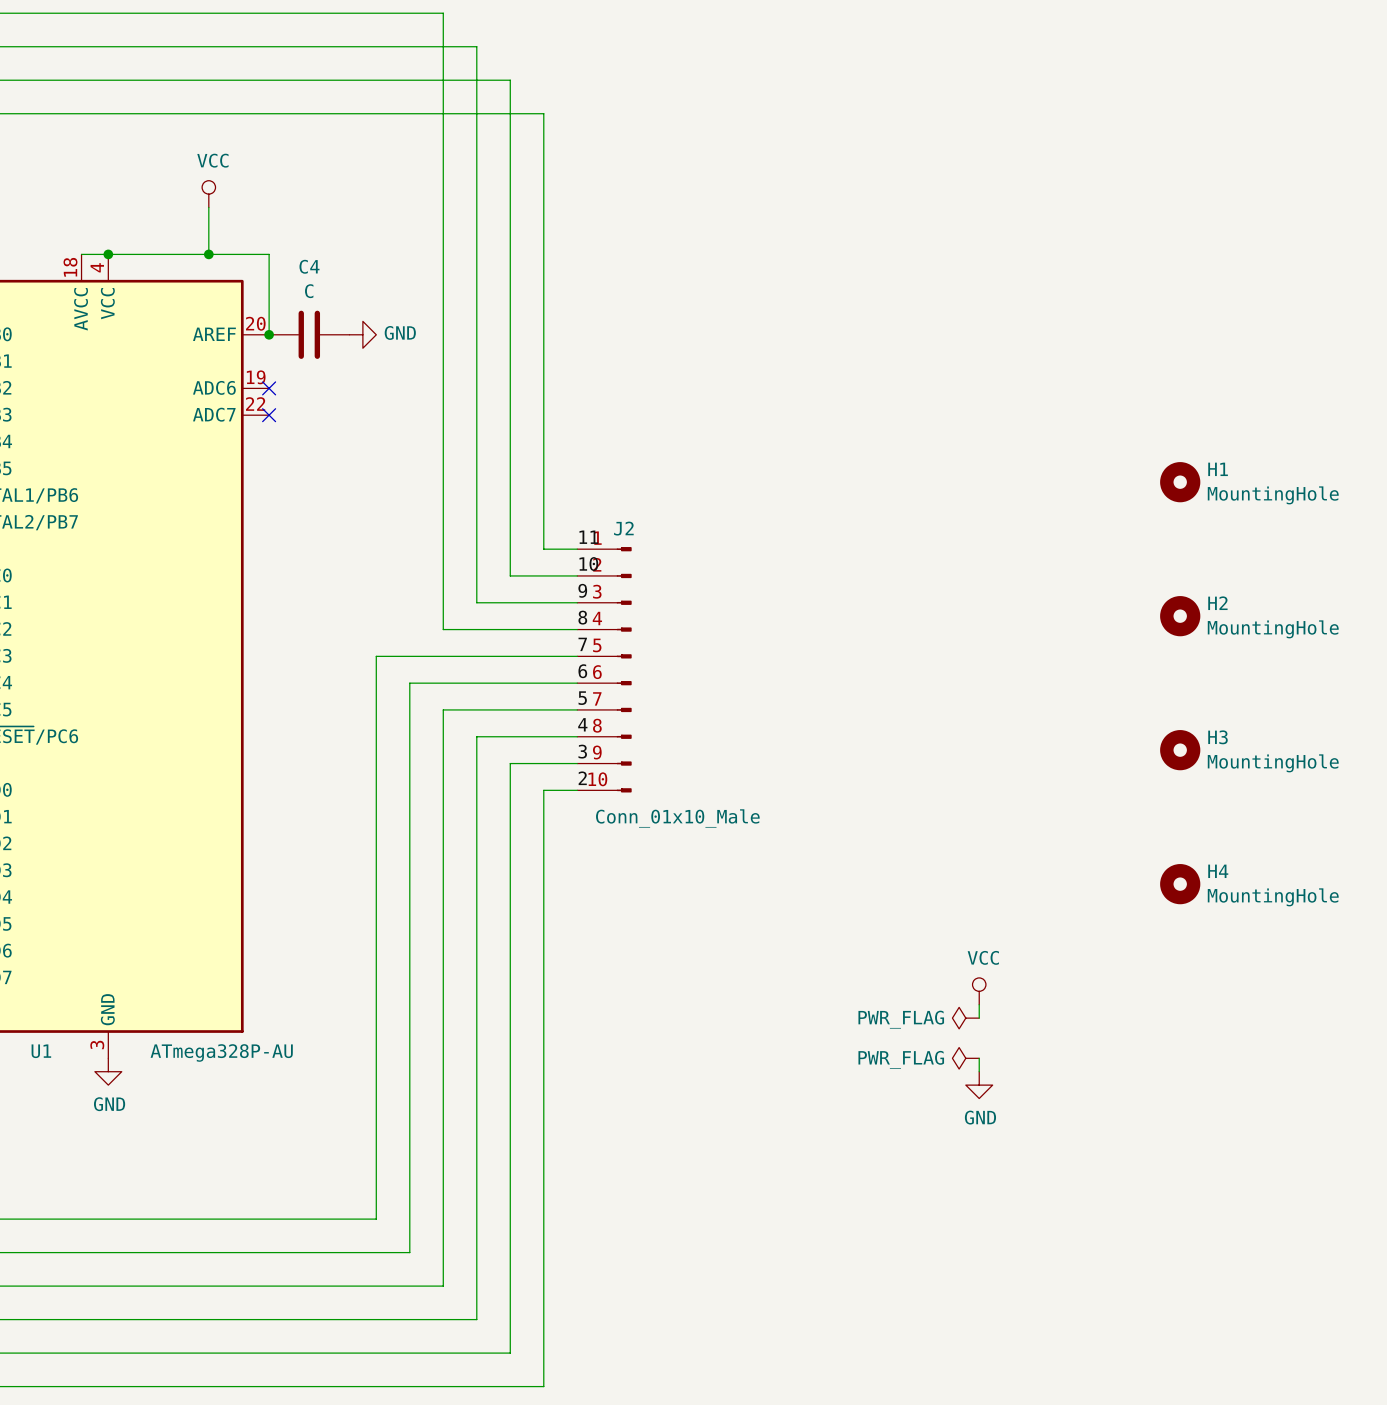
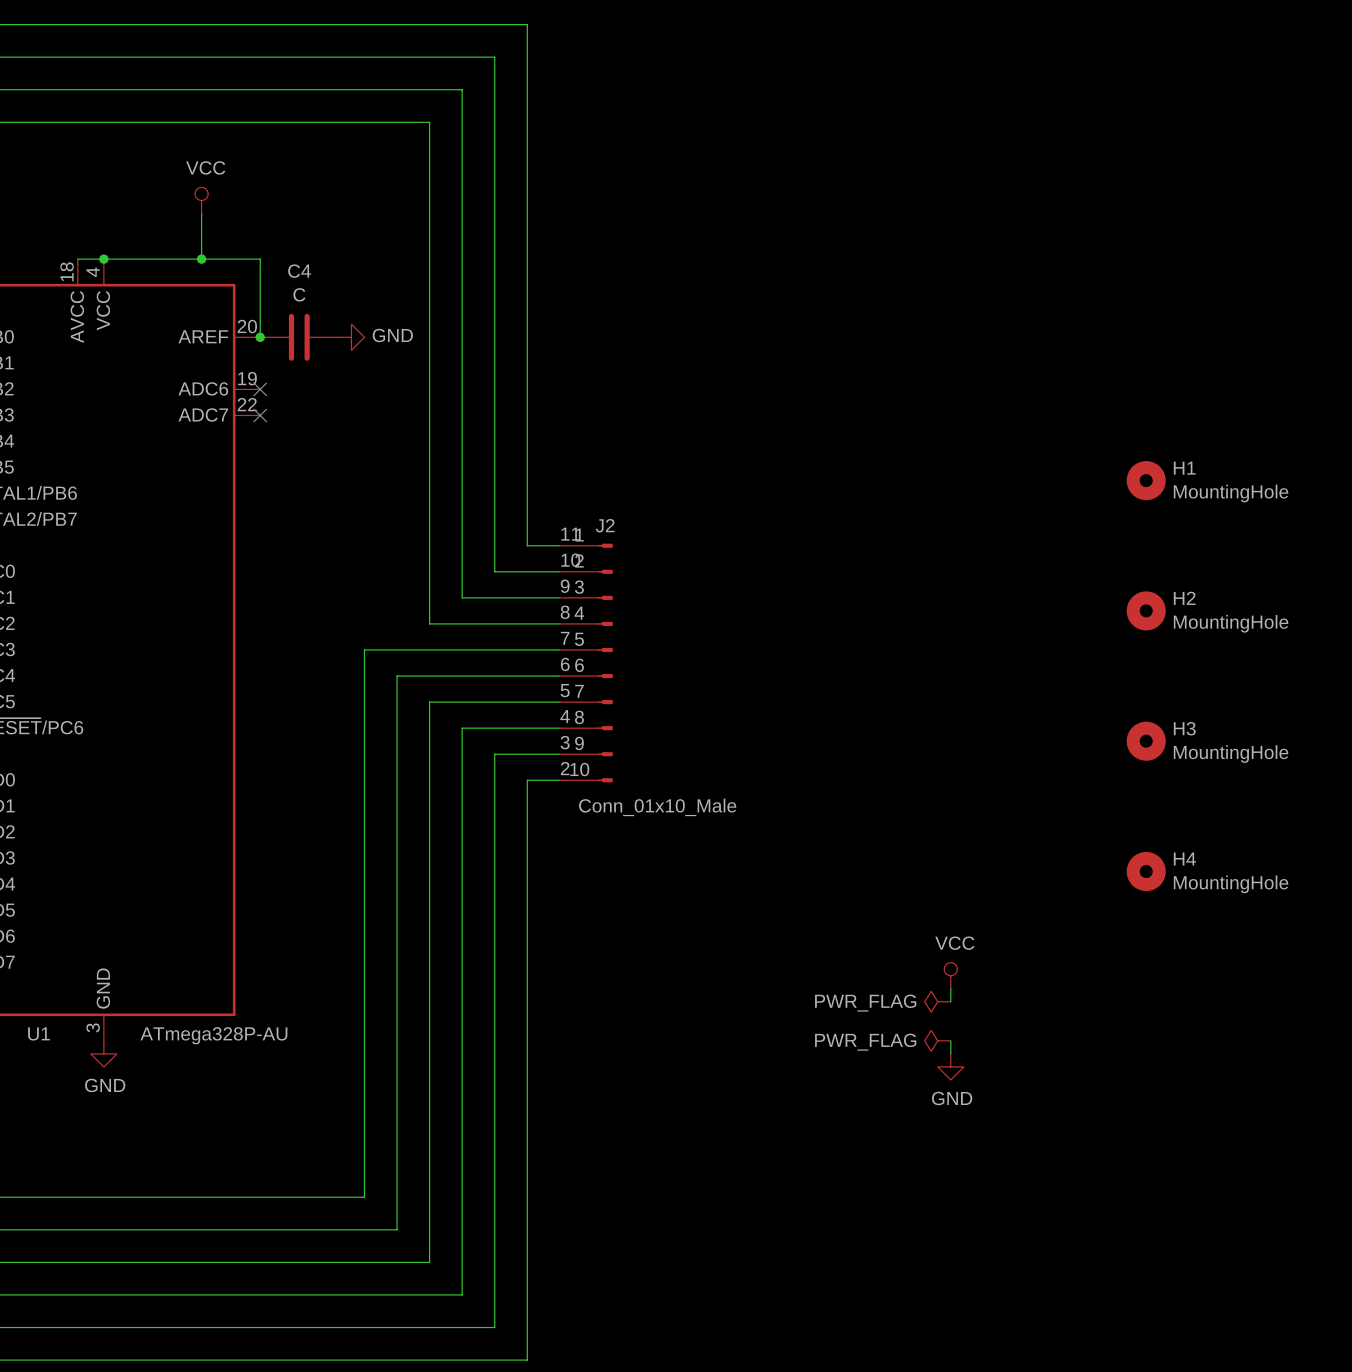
wire: (443, 13) (443, 113) (543, 113) -> (429, 24) (527, 24) (527, 122)
wire: (476, 46) (476, 80) (510, 80) -> (462, 57) (494, 57) (494, 89)

